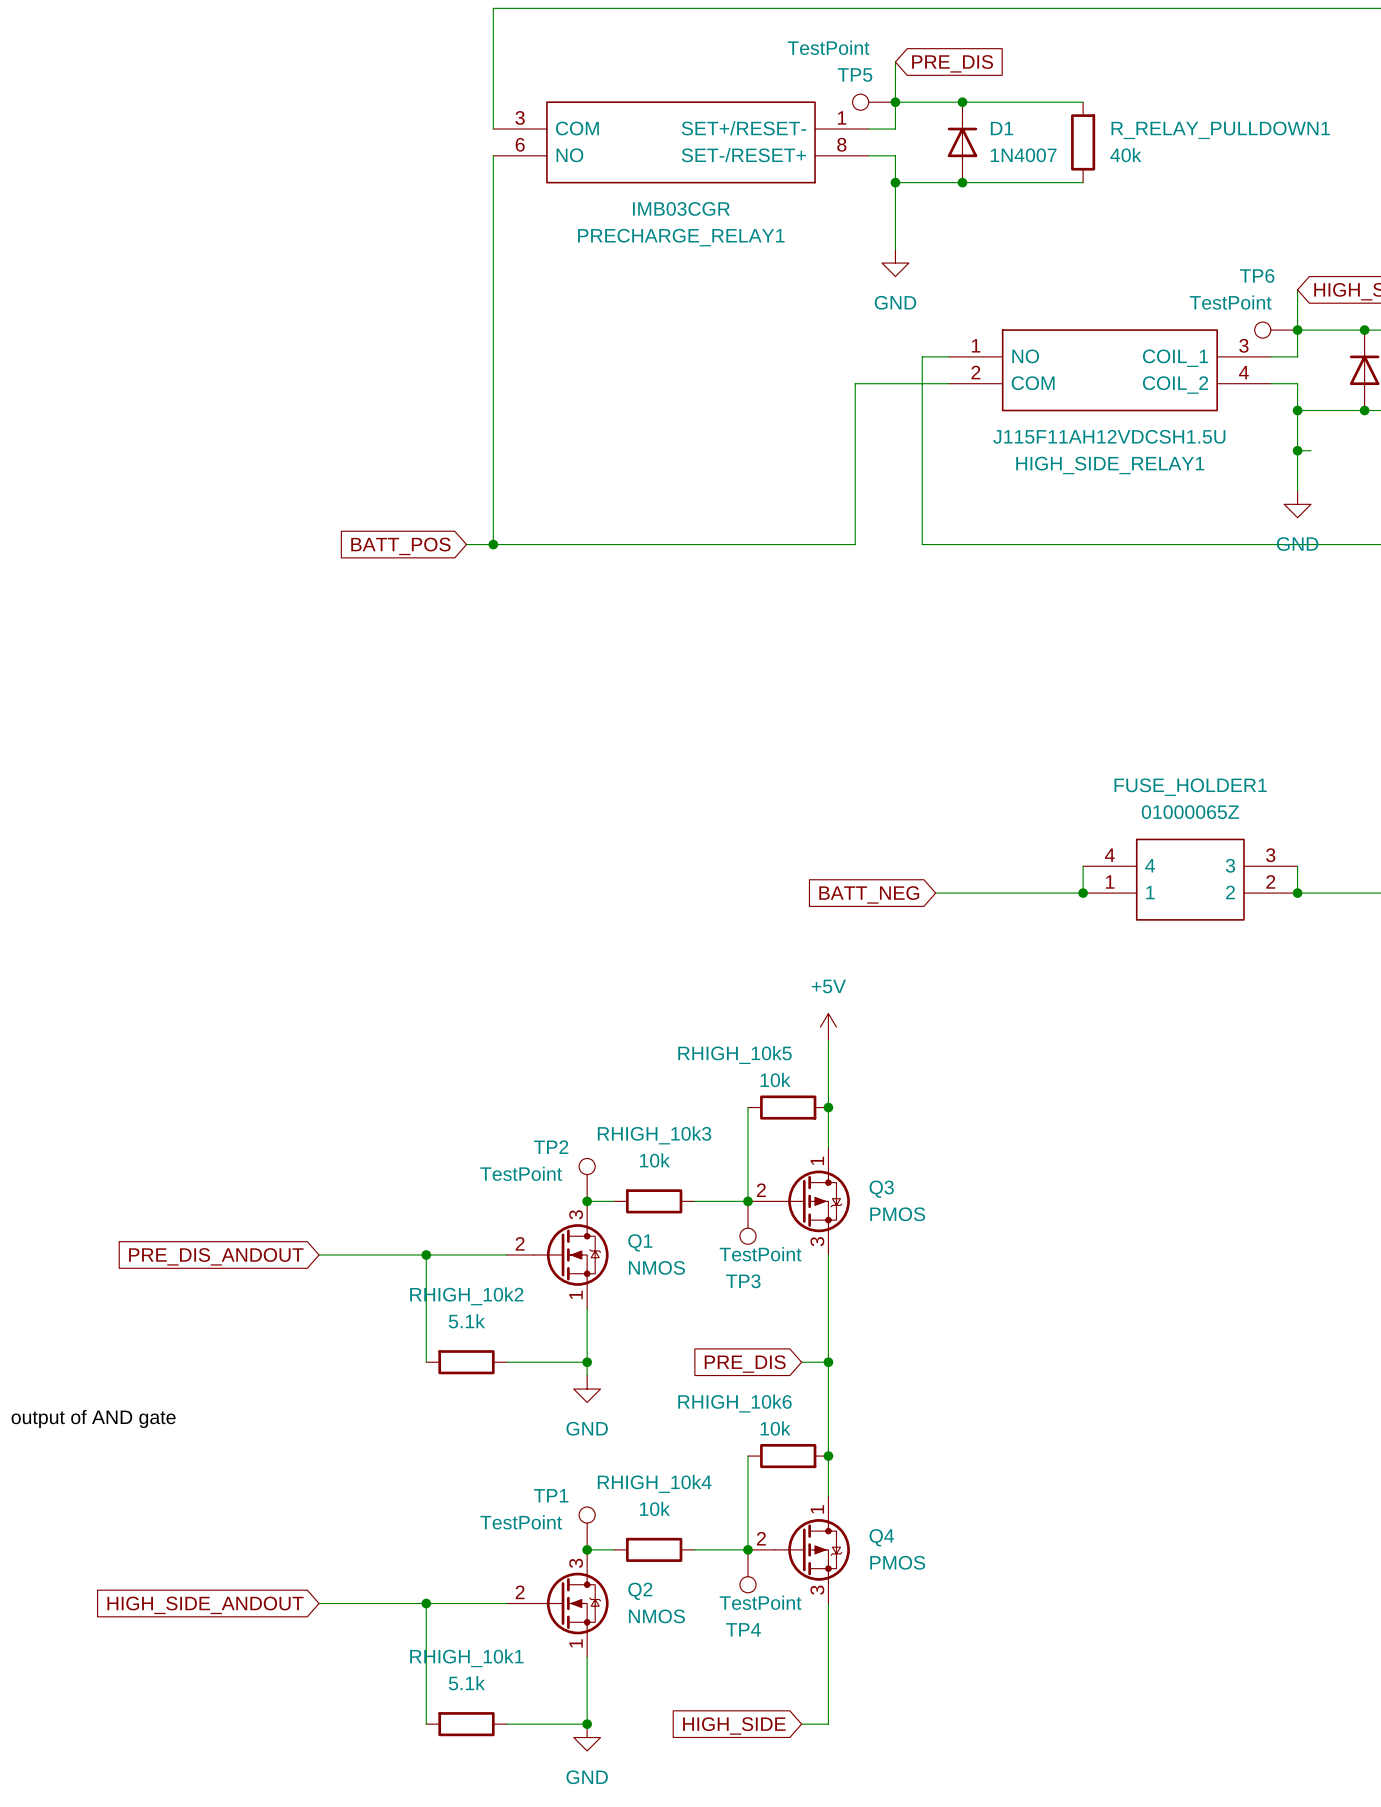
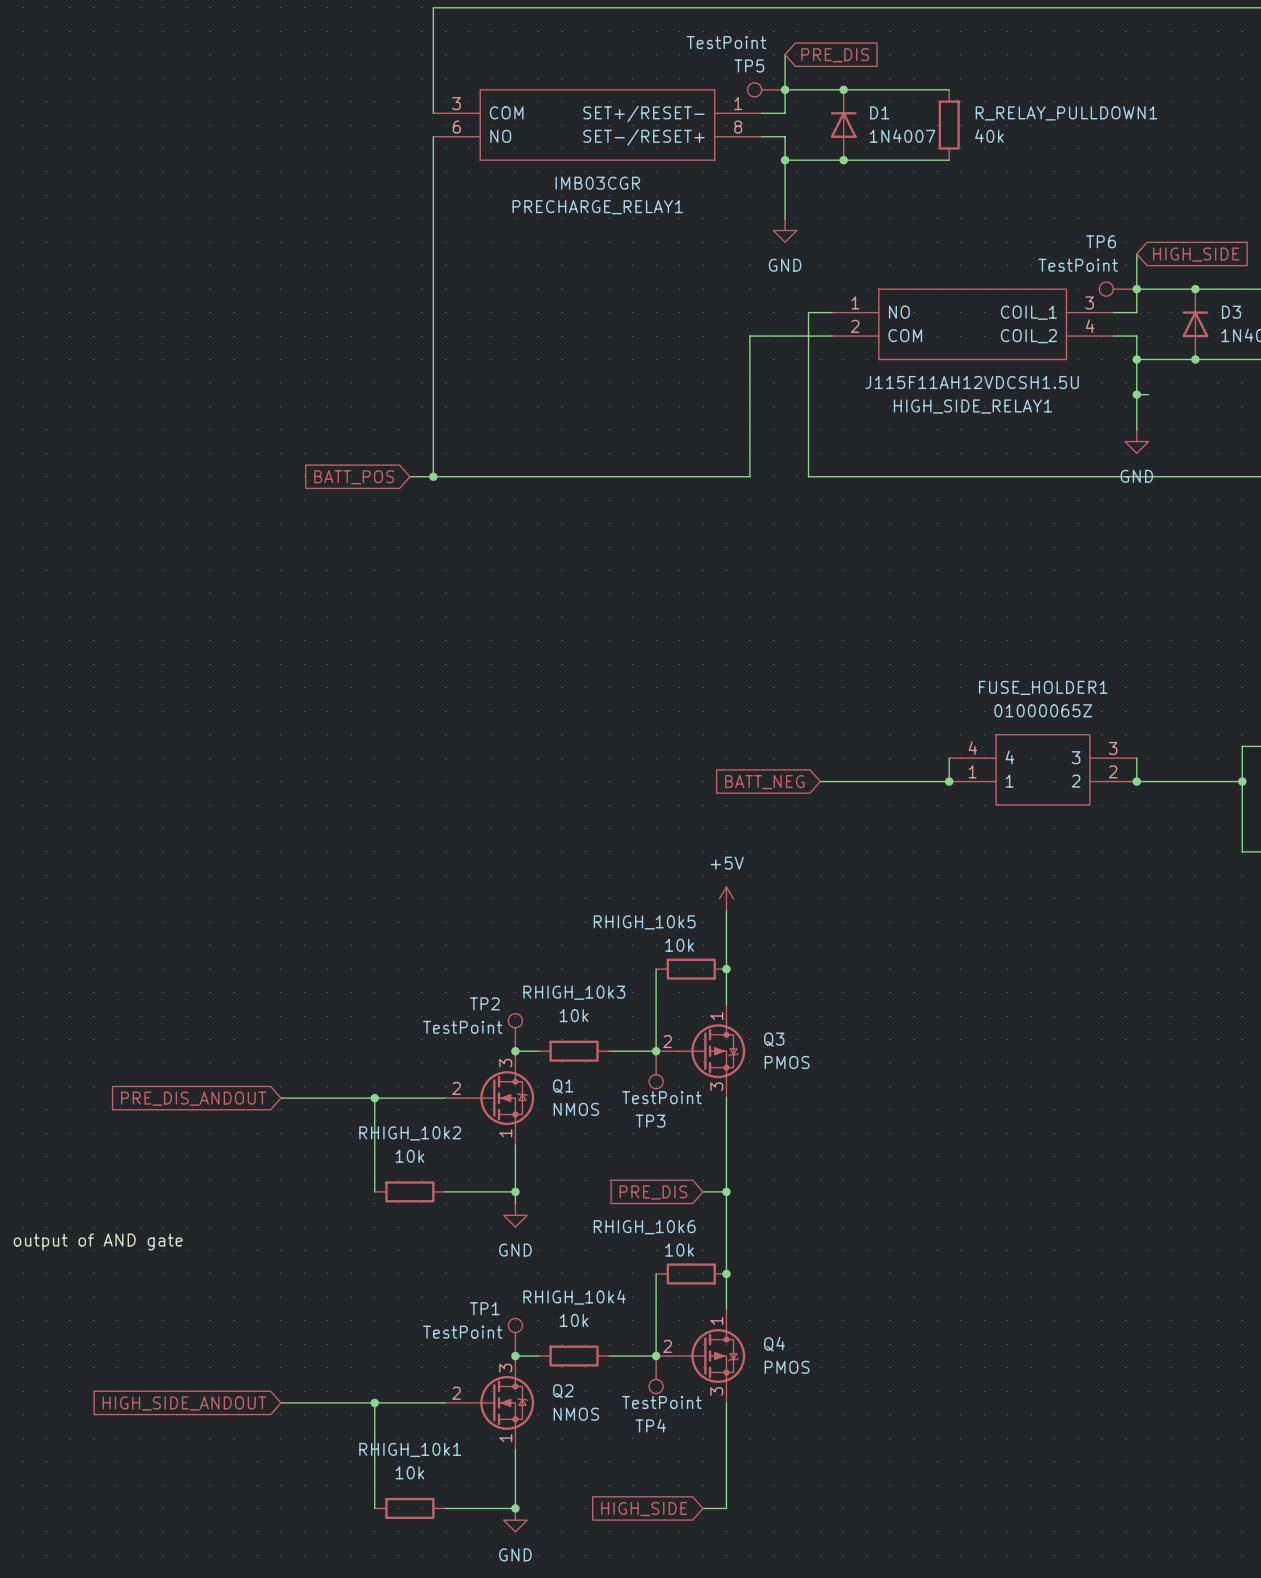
RHIGH_10k2 value: 5.1k (466, 1321) -> 10k (409, 1156)
RHIGH_10k1 value: 5.1k (466, 1683) -> 10k (409, 1472)

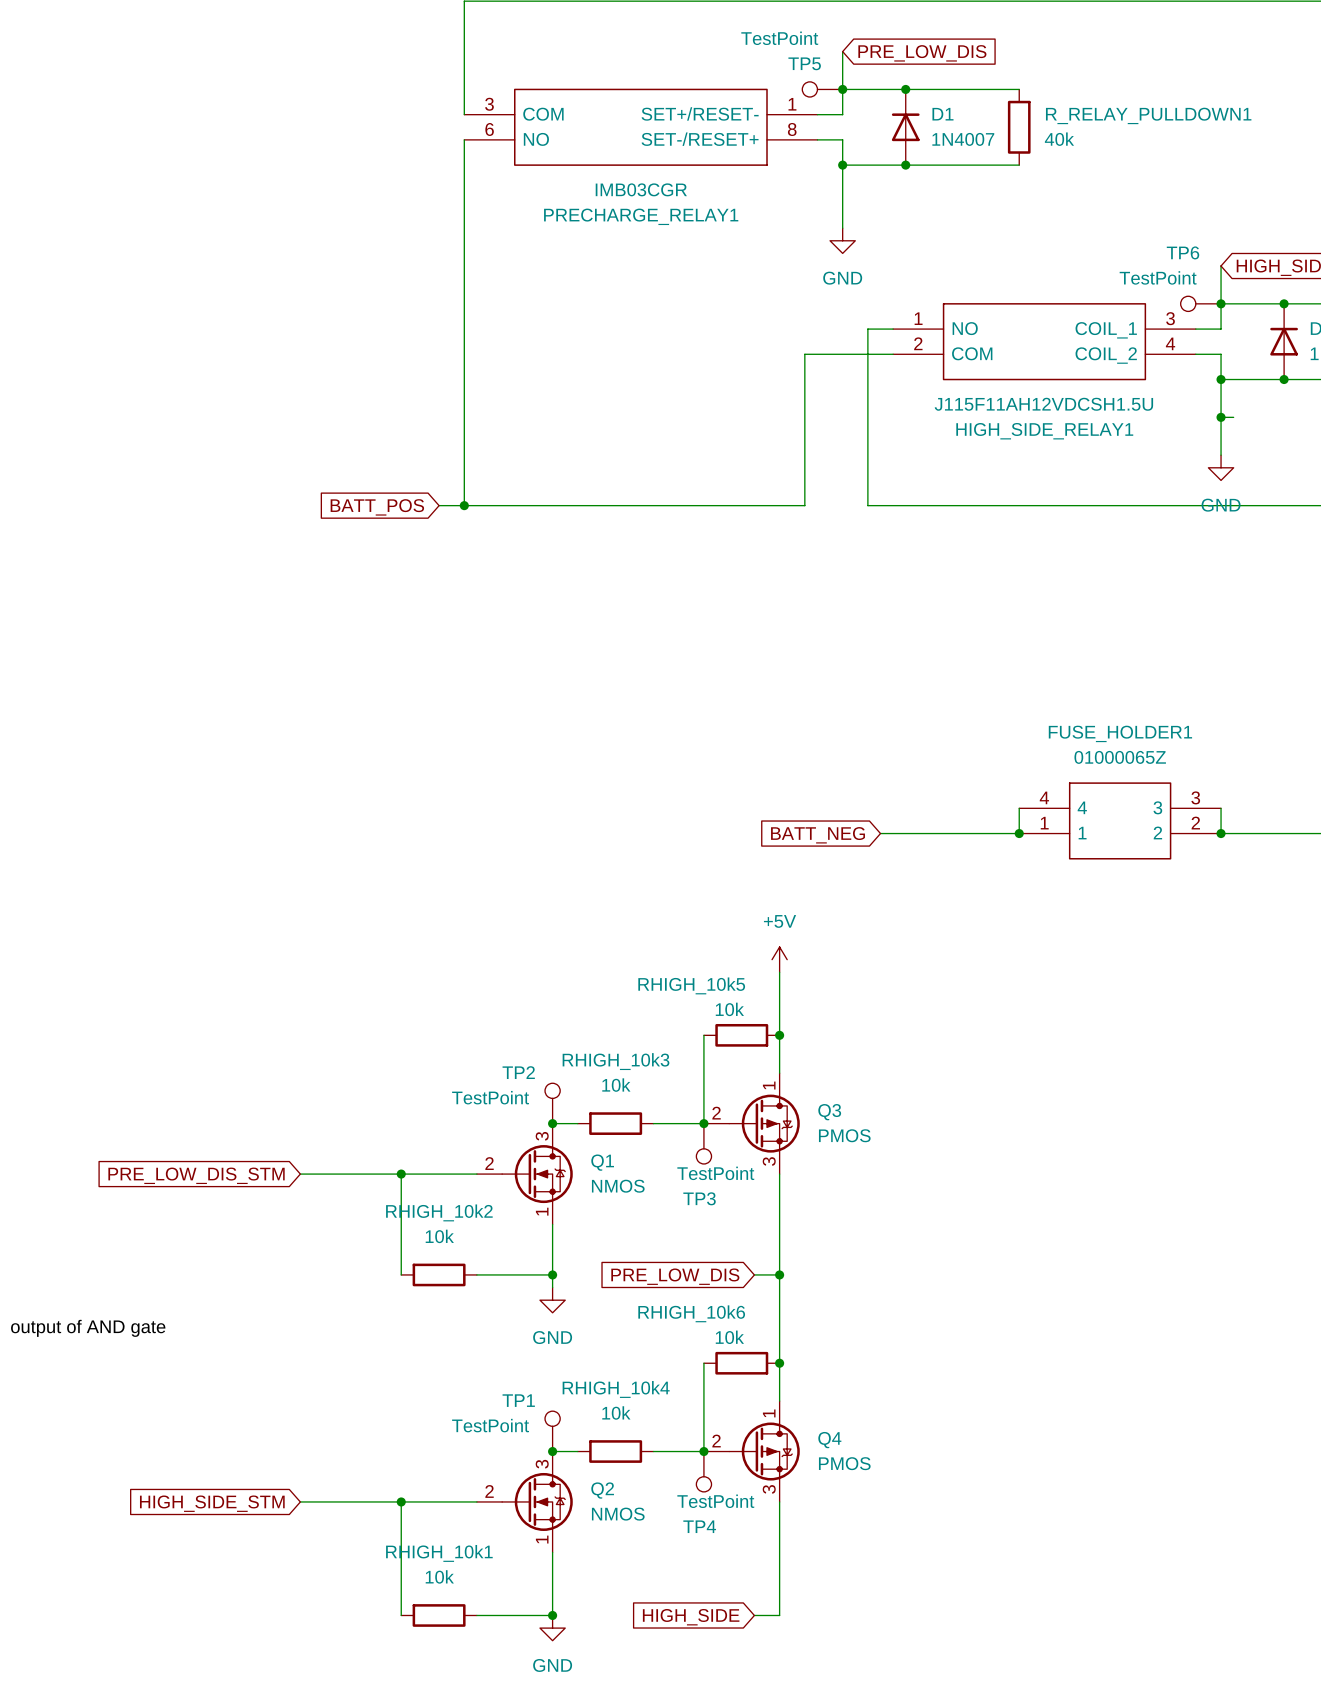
global label: PRE_DIS (835, 55) -> PRE_LOW_DIS (922, 53)
global label: PRE_DIS_ANDOUT (193, 1098) -> PRE_LOW_DIS_STM (196, 1175)
global label: PRE_DIS (653, 1192) -> PRE_LOW_DIS (675, 1276)
global label: HIGH_SIDE_ANDOUT (184, 1403) -> HIGH_SIDE_STM (212, 1503)

